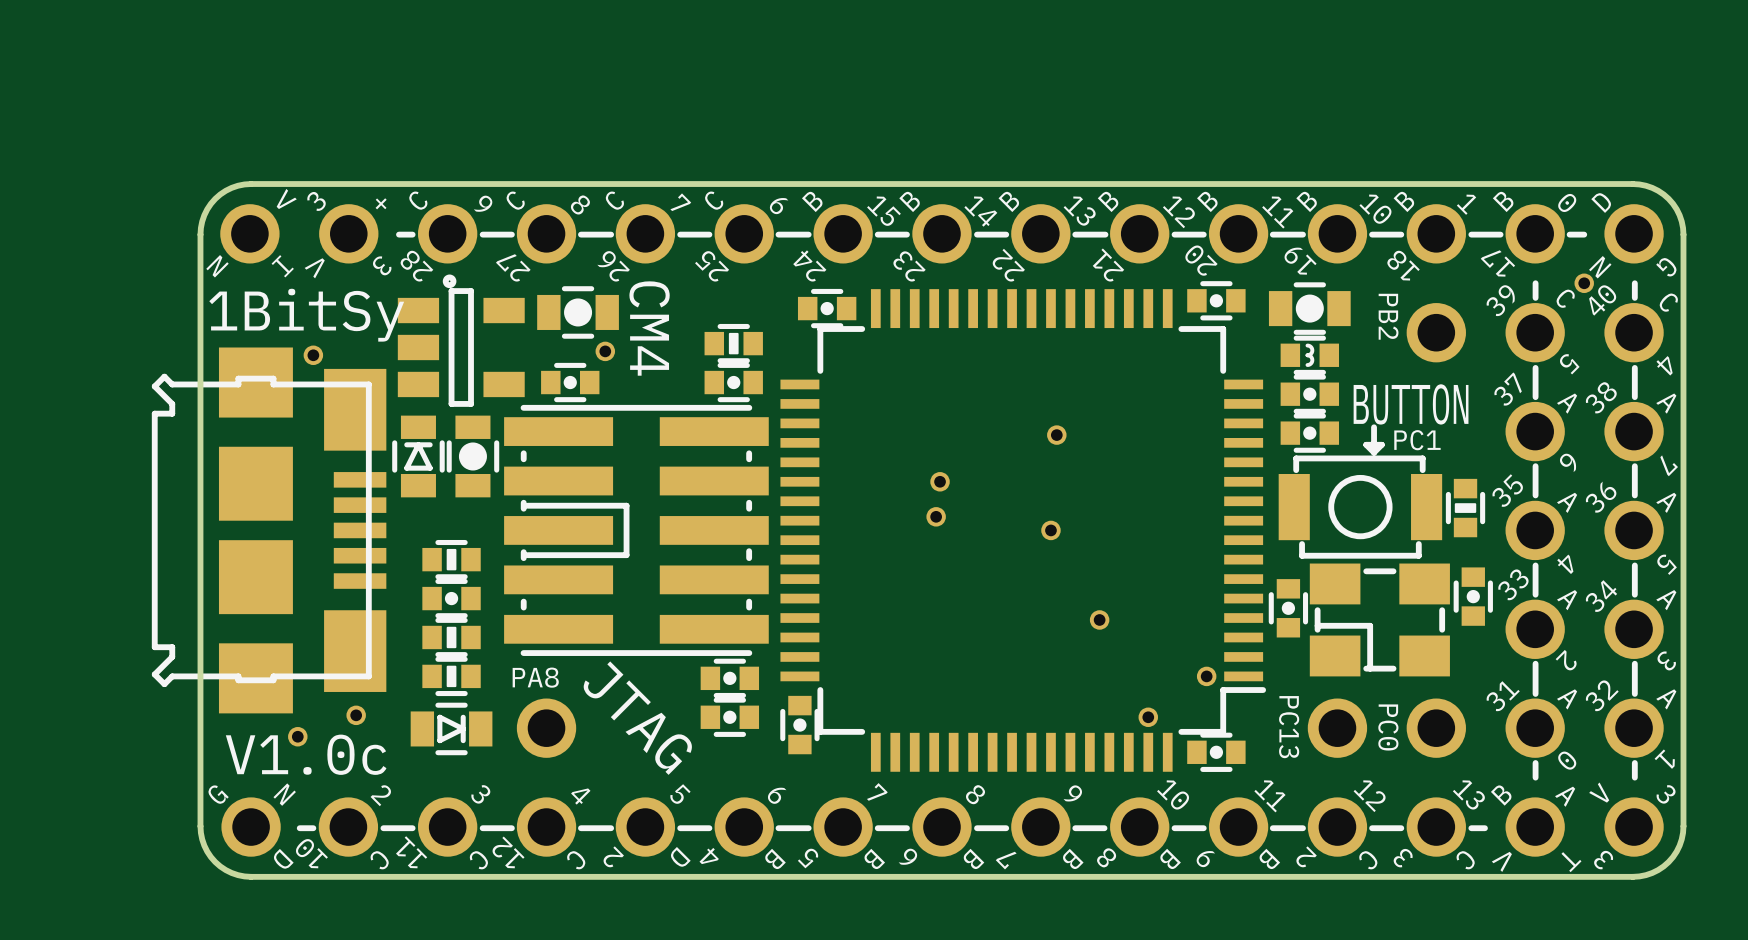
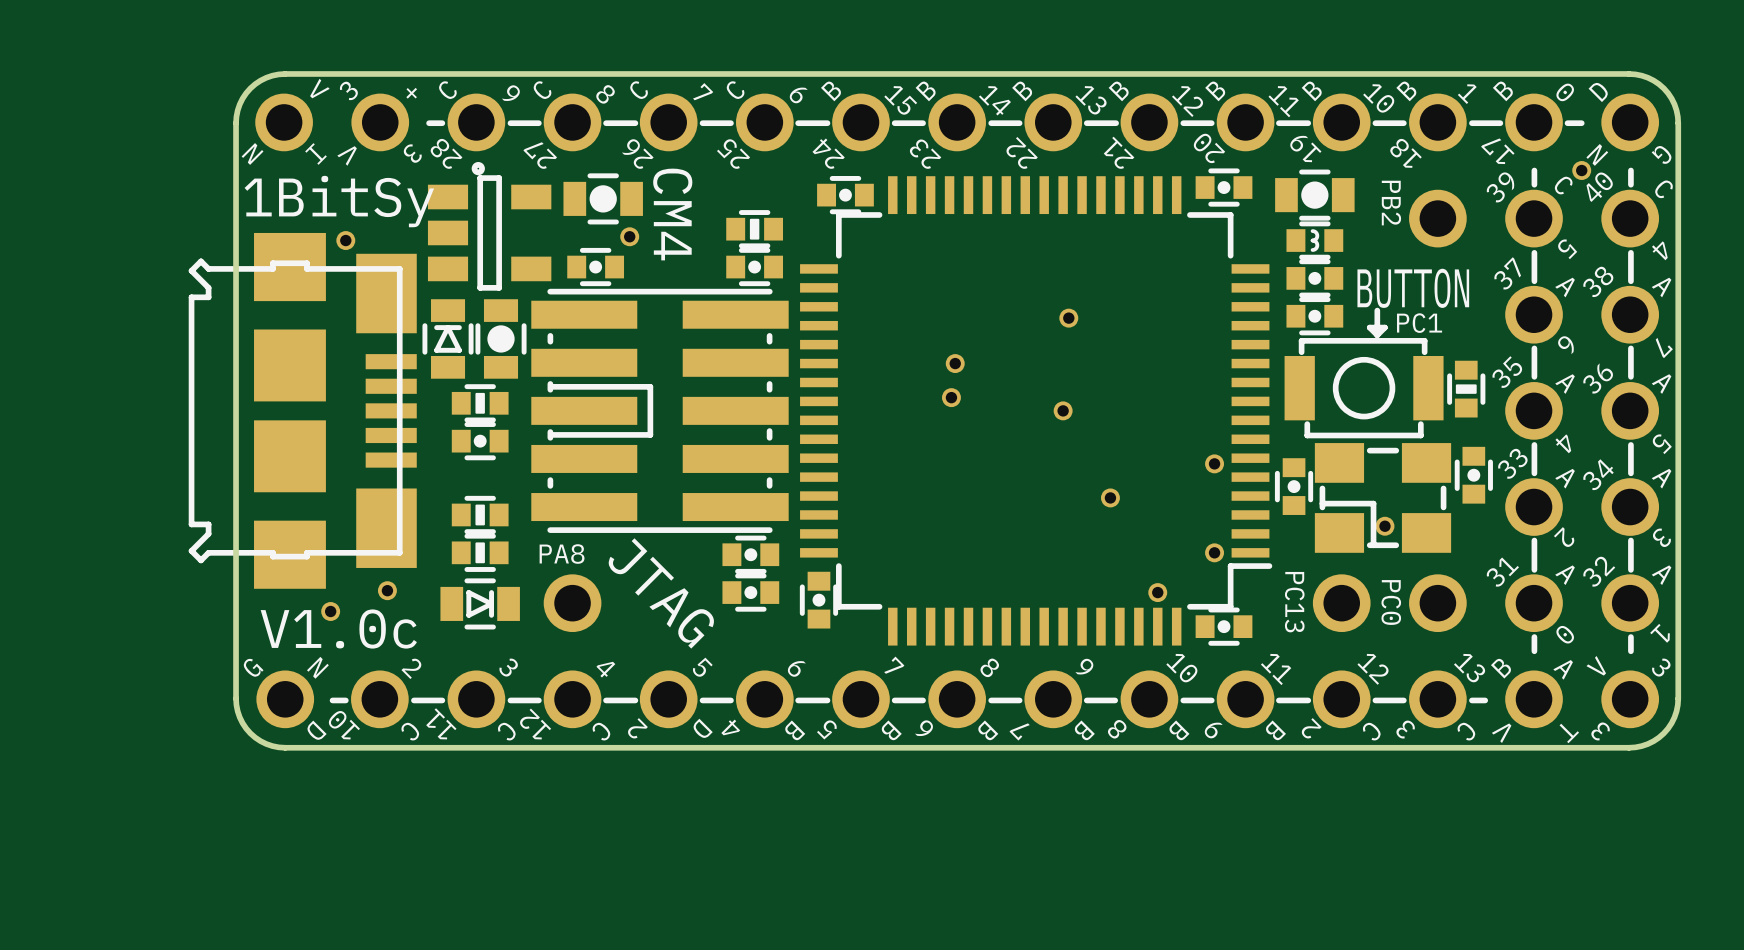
part: none -> (480, 403)
part footprint: [422, 539, 481, 580] -> [451, 422, 509, 461]
part: none -> (1214, 463)
part: (451, 598) -> none
part: none -> (1384, 526)

